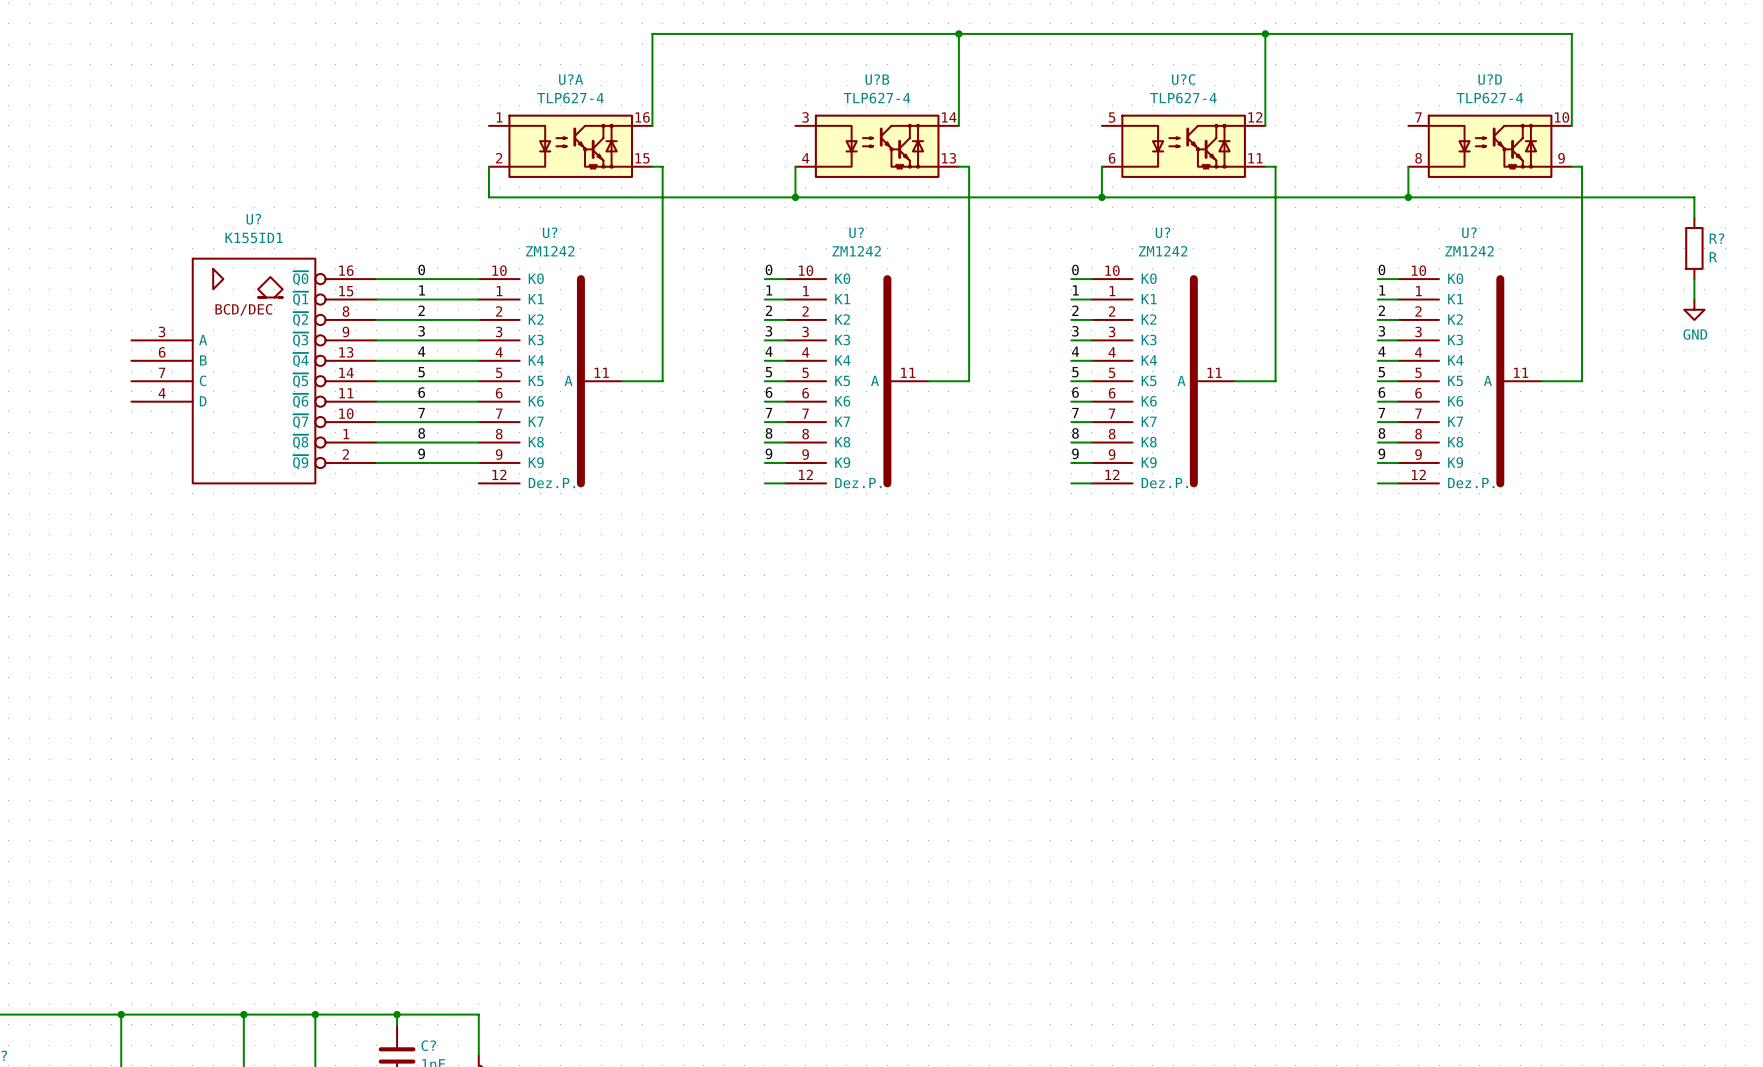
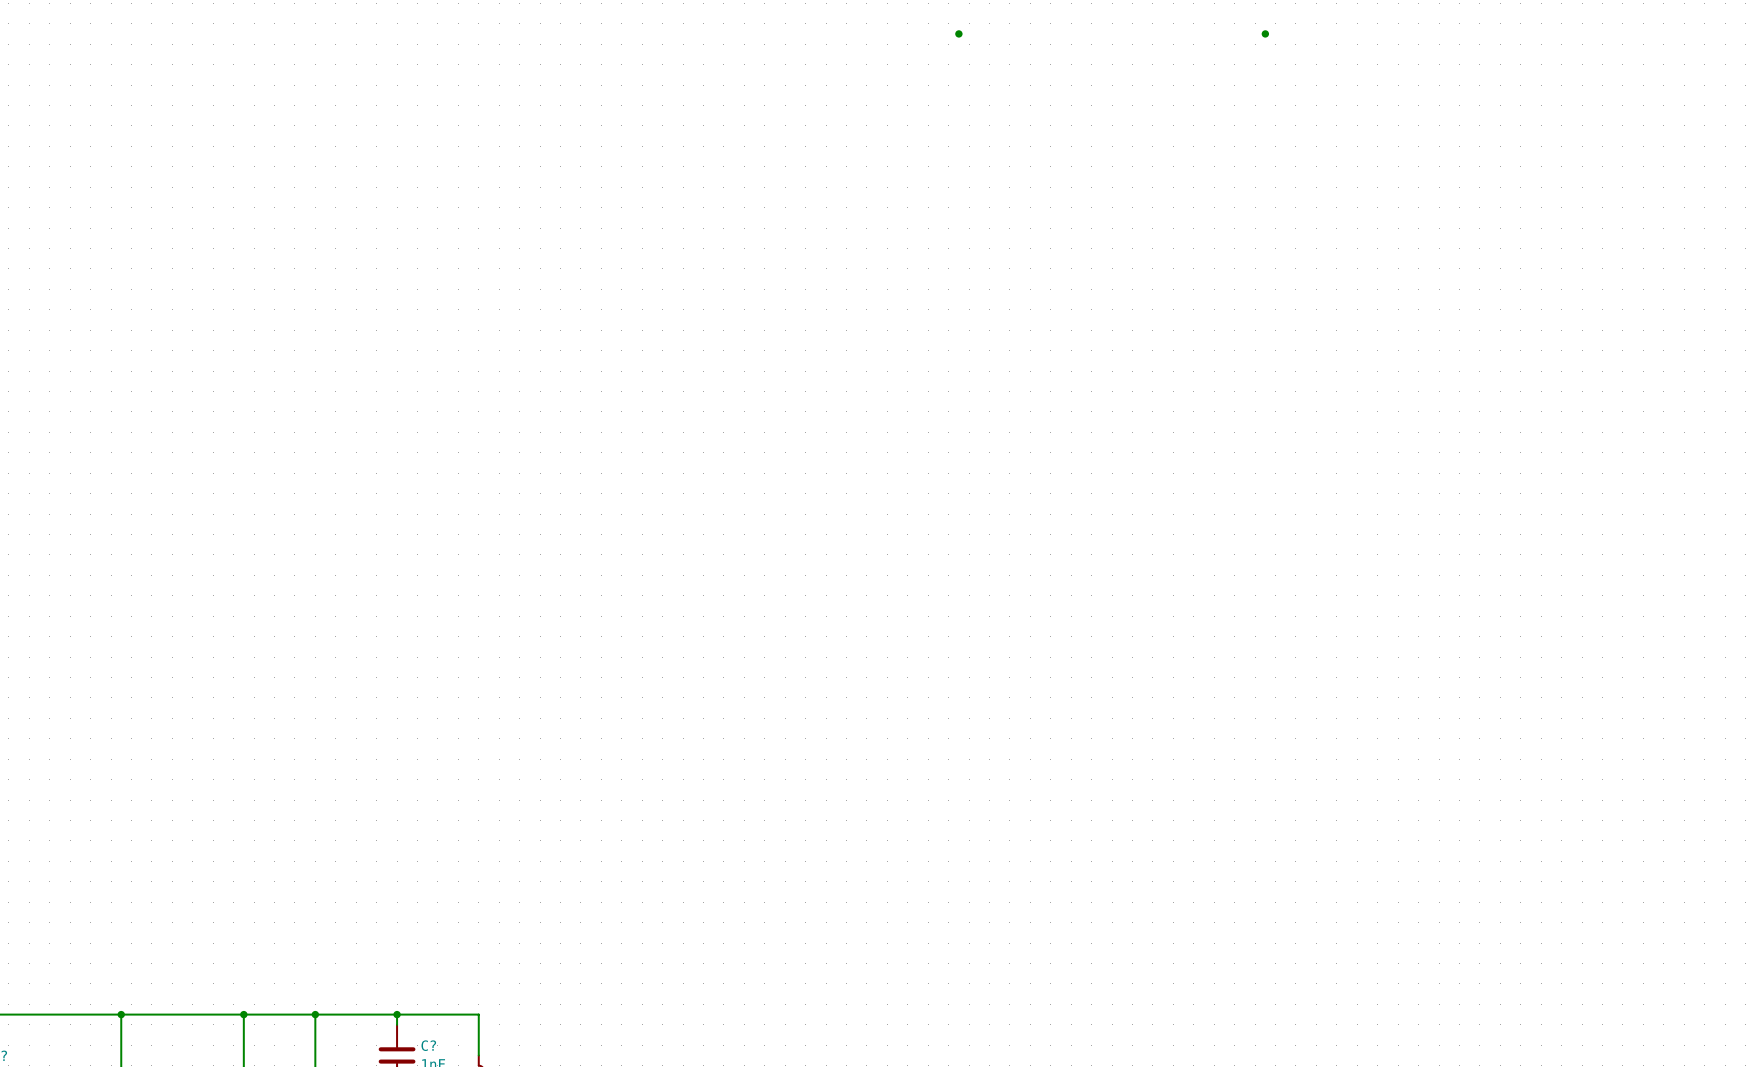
wire: (958, 33) (958, 125) -> none
wire: (1265, 33) (1265, 125) -> none
wire: (652, 125) (652, 33) (1571, 33) (1571, 125) -> none
U?A: TLP627-4 (570, 146) -> none
U?B: TLP627-4 (877, 146) -> none
U?C: TLP627-4 (1183, 146) -> none
U?D: TLP627-4 (1490, 146) -> none
wire: (488, 166) (488, 197) (1694, 197) (1694, 217) -> none
wire: (652, 166) (662, 166) (662, 381) (621, 381) -> none
wire: (795, 166) (795, 197) -> none
wire: (958, 166) (969, 166) (969, 381) (928, 381) -> none
wire: (1101, 166) (1101, 197) -> none
wire: (1265, 166) (1275, 166) (1275, 381) (1234, 381) -> none
wire: (1408, 166) (1408, 197) -> none
wire: (1571, 166) (1582, 166) (1582, 381) (1541, 381) -> none
junction: (795, 197) -> none
junction: (1101, 197) -> none
junction: (1408, 197) -> none
R?: R (1694, 248) -> none
label: 0 (421, 269) -> none
label: 0 (769, 269) -> none
label: 0 (1075, 269) -> none
label: 0 (1381, 269) -> none
wire: (376, 279) (478, 279) -> none
wire: (764, 279) (785, 279) -> none
wire: (1071, 279) (1091, 279) -> none
wire: (1377, 279) (1398, 279) -> none
wire: (1694, 279) (1694, 299) -> none
label: 1 (422, 290) -> none
label: 1 (769, 290) -> none
label: 1 (1075, 290) -> none
label: 1 (1382, 290) -> none
wire: (376, 299) (478, 299) -> none
wire: (764, 299) (785, 299) -> none
wire: (1071, 299) (1091, 299) -> none
wire: (1377, 299) (1398, 299) -> none
power symbol: GND (1694, 309) -> none
label: 2 (421, 310) -> none
label: 2 (768, 310) -> none
label: 2 (1075, 310) -> none
label: 2 (1381, 310) -> none
wire: (376, 319) (478, 319) -> none
wire: (764, 319) (785, 319) -> none
wire: (1071, 319) (1091, 319) -> none
wire: (1377, 319) (1398, 319) -> none
label: 3 (421, 331) -> none
label: 3 (768, 331) -> none
label: 3 (1075, 331) -> none
label: 3 (1381, 331) -> none
wire: (376, 340) (478, 340) -> none
wire: (764, 340) (785, 340) -> none
wire: (1071, 340) (1091, 340) -> none
wire: (1377, 340) (1398, 340) -> none
label: 4 (421, 351) -> none
label: 4 (769, 351) -> none
label: 4 (1075, 351) -> none
label: 4 (1381, 351) -> none
wire: (376, 360) (478, 360) -> none
wire: (764, 360) (785, 360) -> none
wire: (1071, 360) (1091, 360) -> none
wire: (1377, 360) (1398, 360) -> none
U?: K155ID1 (254, 371) -> none
label: 5 (421, 372) -> none
label: 5 (768, 372) -> none
label: 5 (1075, 372) -> none
label: 5 (1381, 372) -> none
wire: (376, 381) (478, 381) -> none
U?: ZM1242 (550, 381) -> none
wire: (764, 381) (785, 381) -> none
U?: ZM1242 (856, 381) -> none
wire: (1071, 381) (1091, 381) -> none
U?: ZM1242 (1163, 381) -> none
wire: (1377, 381) (1398, 381) -> none
U?: ZM1242 (1469, 381) -> none
label: 6 (421, 392) -> none
label: 6 (769, 392) -> none
label: 6 (1075, 392) -> none
label: 6 (1381, 392) -> none
wire: (376, 401) (478, 401) -> none
wire: (764, 401) (785, 401) -> none
wire: (1071, 401) (1091, 401) -> none
wire: (1377, 401) (1398, 401) -> none
label: 7 (421, 412) -> none
label: 7 (768, 412) -> none
label: 7 (1075, 412) -> none
label: 7 (1381, 412) -> none
wire: (376, 422) (478, 422) -> none
wire: (764, 422) (785, 422) -> none
wire: (1071, 422) (1091, 422) -> none
wire: (1377, 422) (1398, 422) -> none
label: 8 (421, 433) -> none
label: 8 (769, 433) -> none
label: 8 (1075, 433) -> none
label: 8 (1381, 433) -> none
wire: (376, 442) (478, 442) -> none
wire: (764, 442) (785, 442) -> none
wire: (1071, 442) (1091, 442) -> none
wire: (1377, 442) (1398, 442) -> none
label: 9 (421, 453) -> none
label: 9 (768, 453) -> none
label: 9 (1075, 453) -> none
label: 9 (1381, 453) -> none
wire: (376, 462) (478, 462) -> none
wire: (764, 462) (785, 462) -> none
wire: (1071, 462) (1091, 462) -> none
wire: (1377, 462) (1398, 462) -> none
wire: (764, 483) (785, 483) -> none
wire: (1071, 483) (1091, 483) -> none
wire: (1377, 483) (1398, 483) -> none

